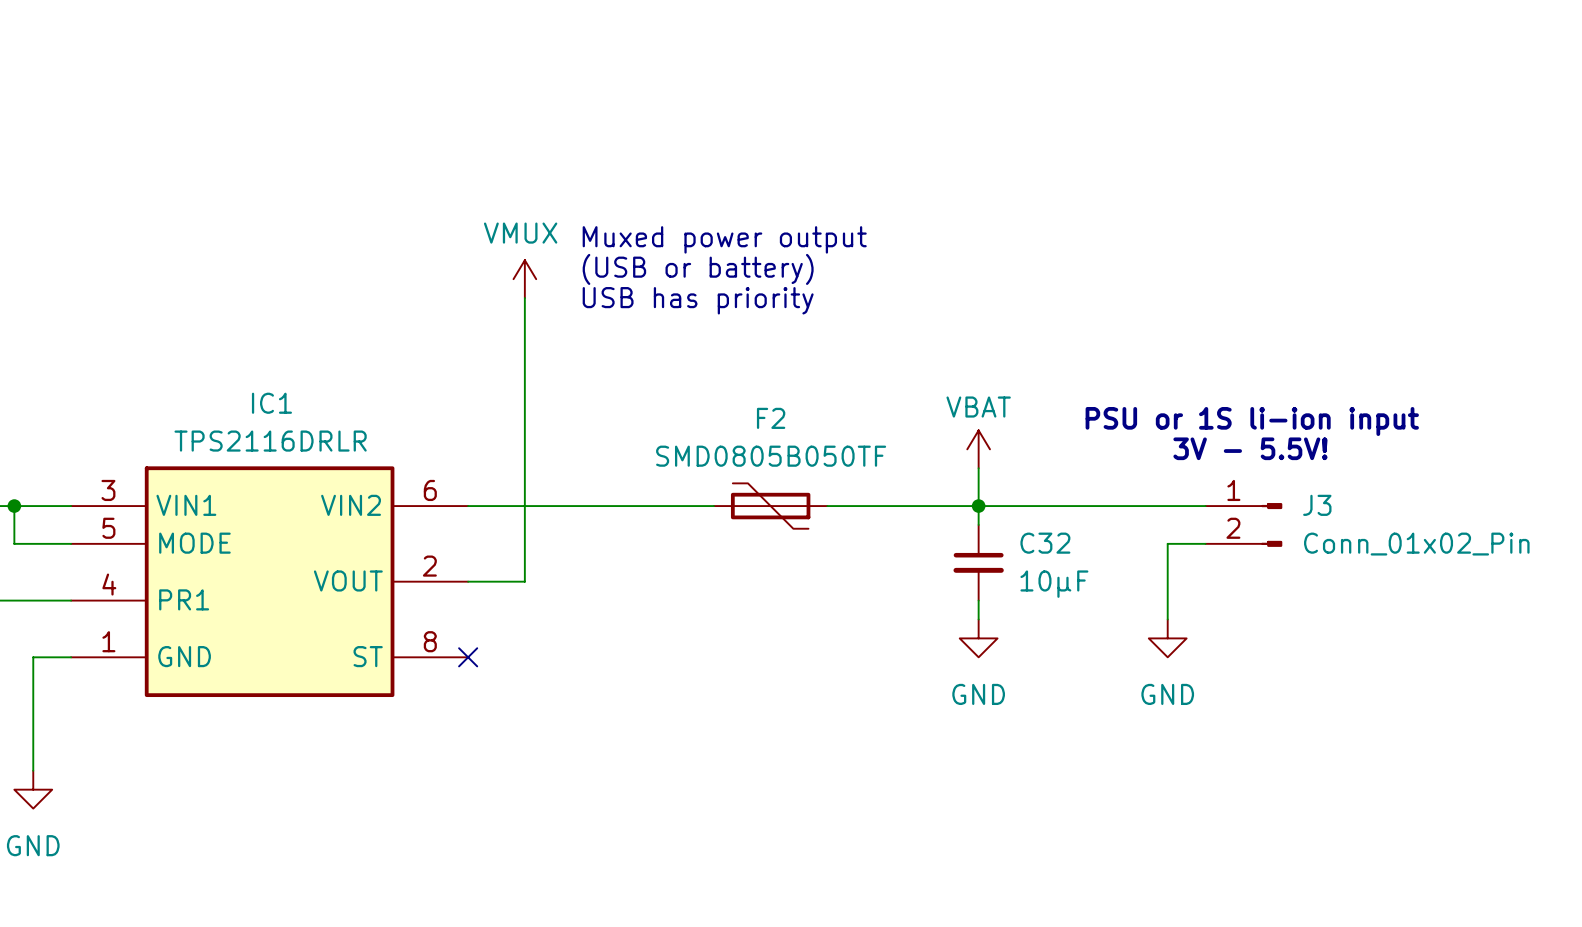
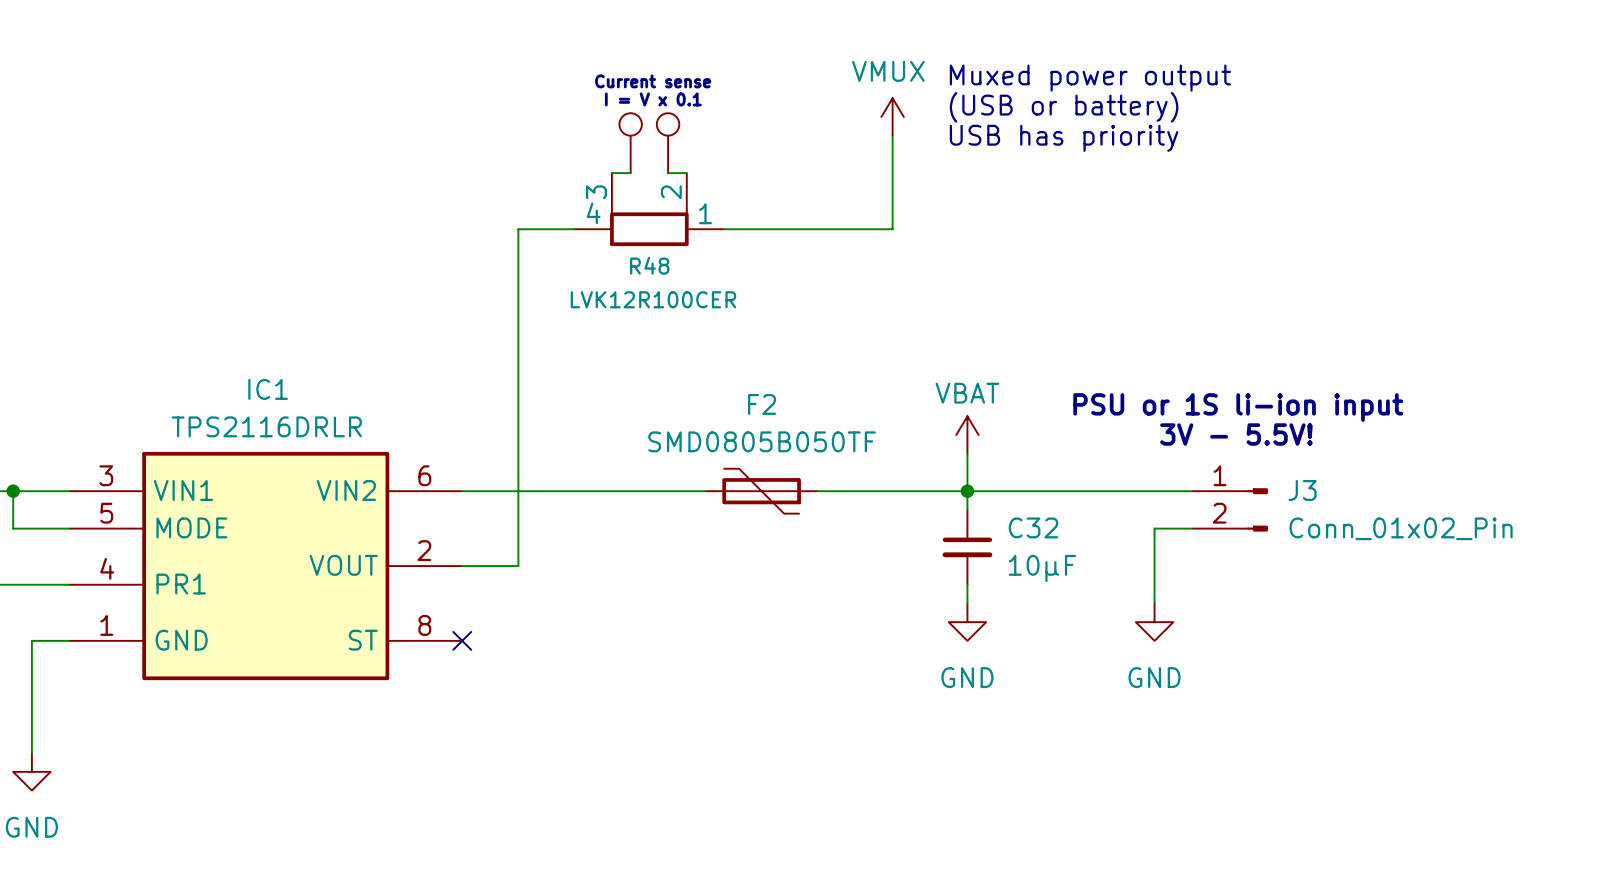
text: none -> Muxed power output (1090, 78)
text: none -> Current sense (653, 81)
text: none -> I = V x 0.1 (653, 99)
text: none -> (USB or battery) (1064, 107)
power symbol: none -> VMUX (892, 116)
wire: none -> (892, 135) (892, 229) (724, 229)
text: none -> USB has priority (1064, 138)
part: none -> (630, 143)
part: none -> (668, 143)
wire: none -> (611, 173) (630, 173)
wire: none -> (668, 173) (686, 173)
R48: none -> LVK12R100CER (649, 209)
text: Muxed power output (724, 239) -> none
wire: none -> (574, 229) (518, 229) (518, 285)
text: (USB or battery) (698, 269) -> none
power symbol: VMUX (524, 279) -> none
text: USB has priority (698, 300) -> none

